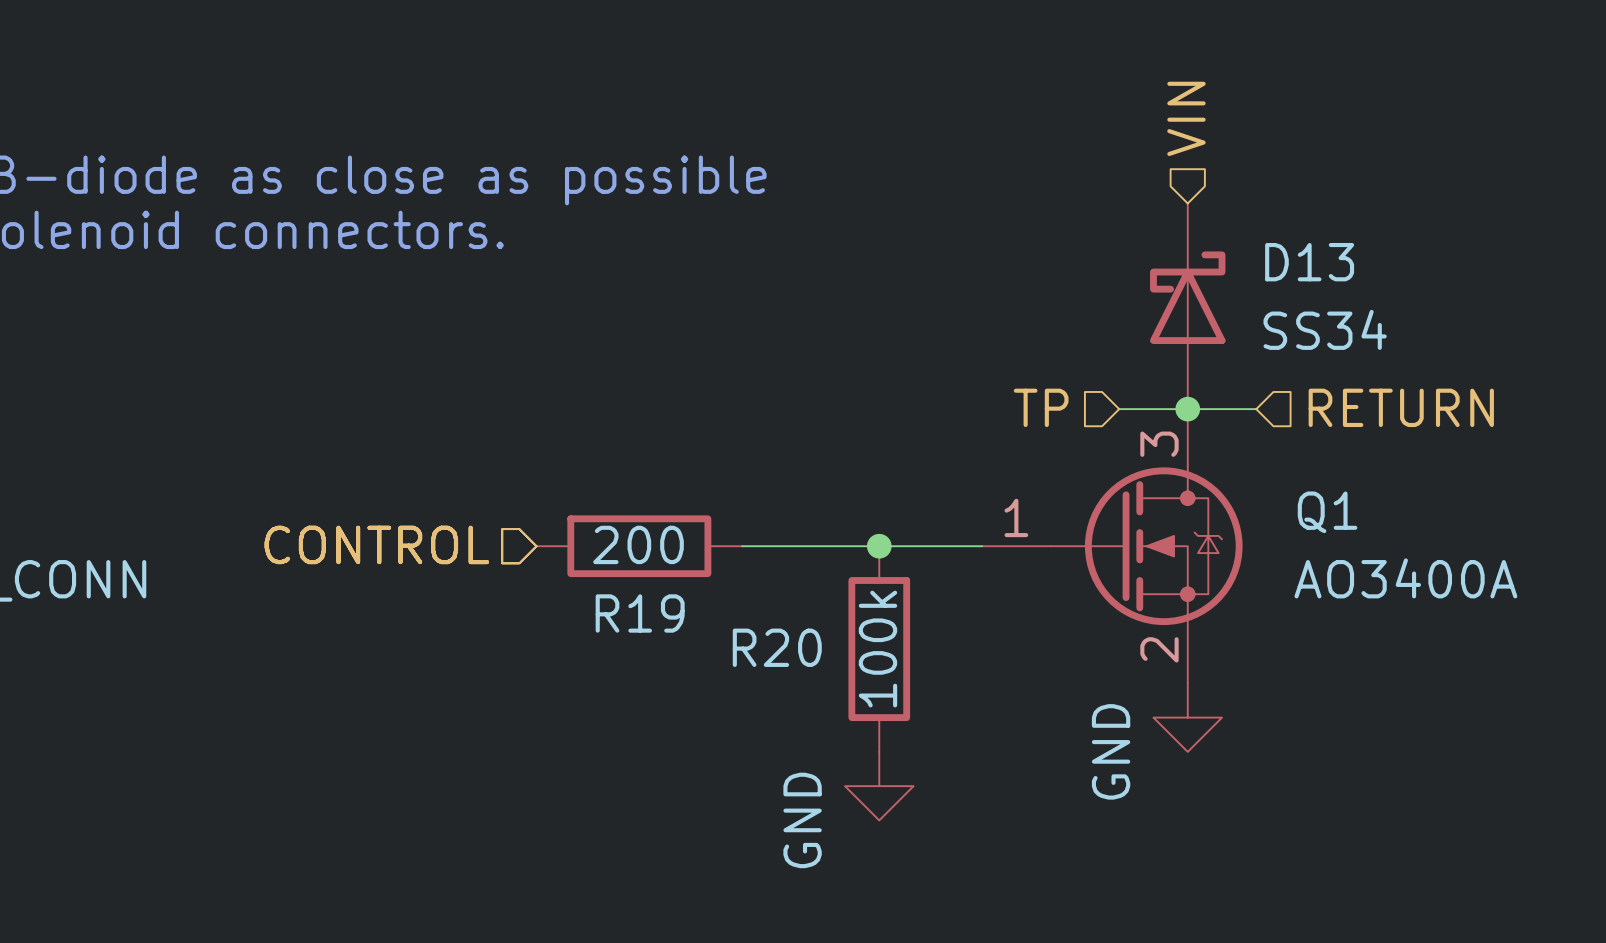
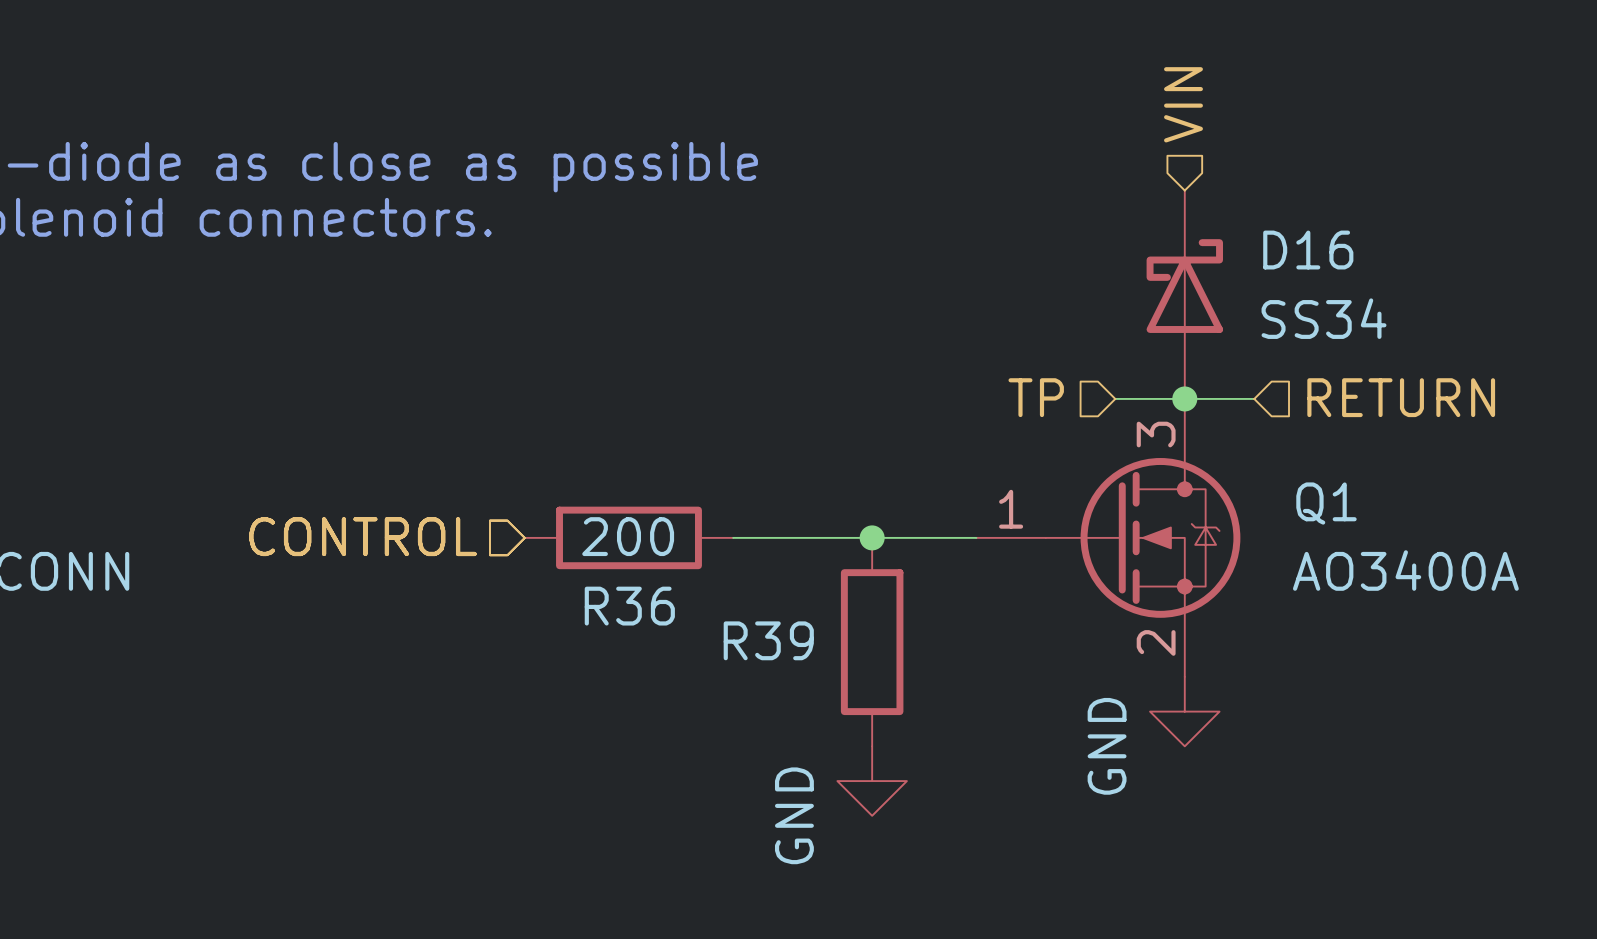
D13 name: D13 (1309, 262) -> D16 (1308, 250)
R19 name: R19 (640, 613) -> R36 (629, 606)
R20 name: R20 (777, 647) -> R39 (768, 640)
R20 value: 100k (877, 649) -> none

